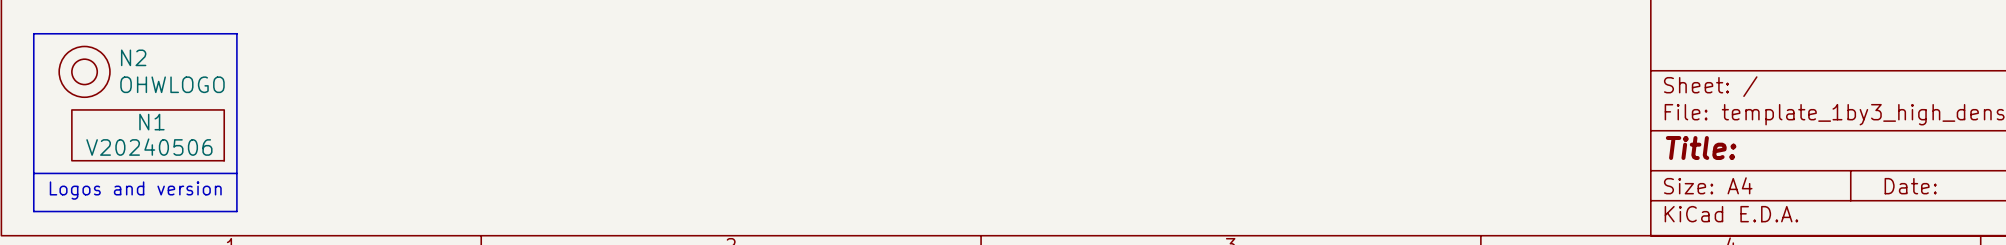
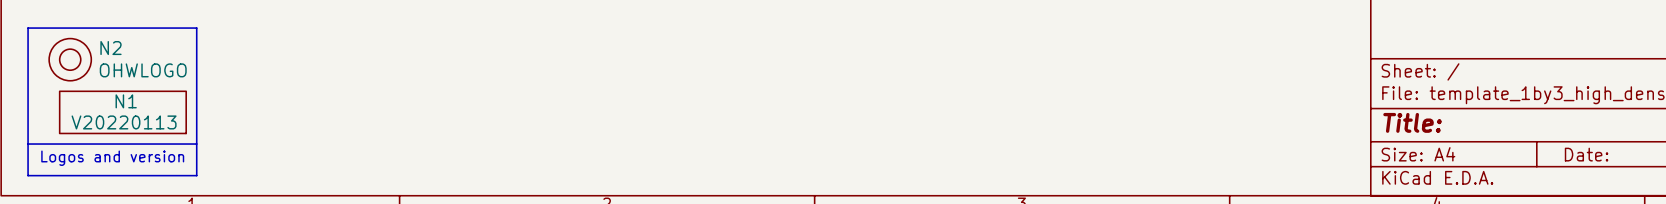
N1 value: V20240506 (149, 147) -> V20220113 (124, 122)

